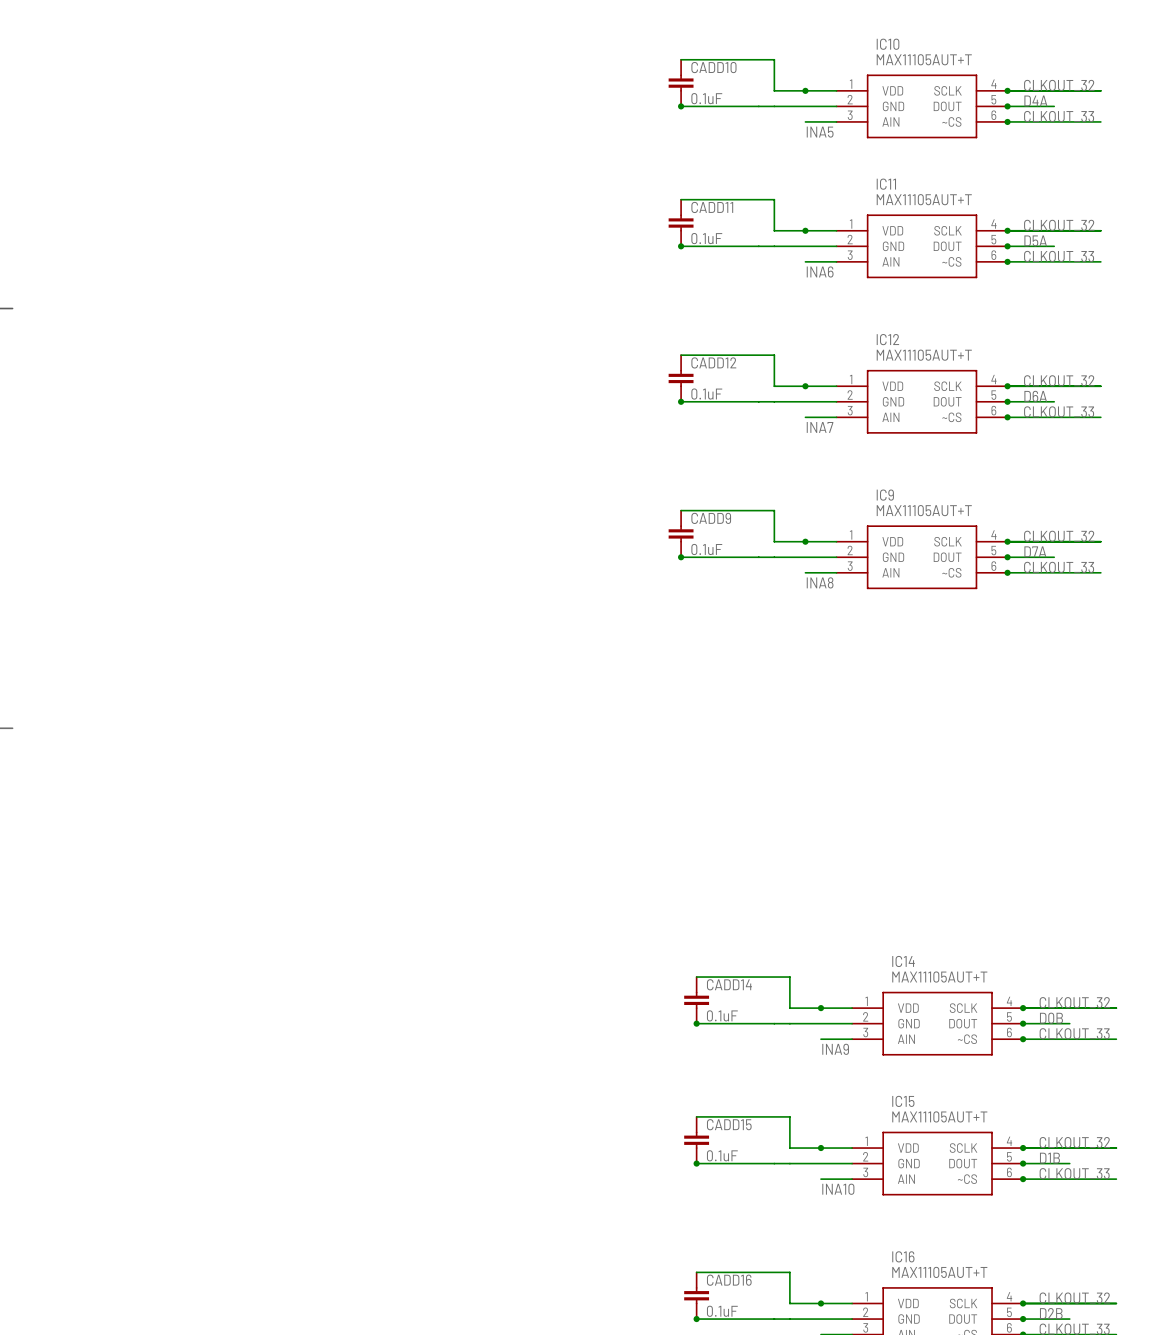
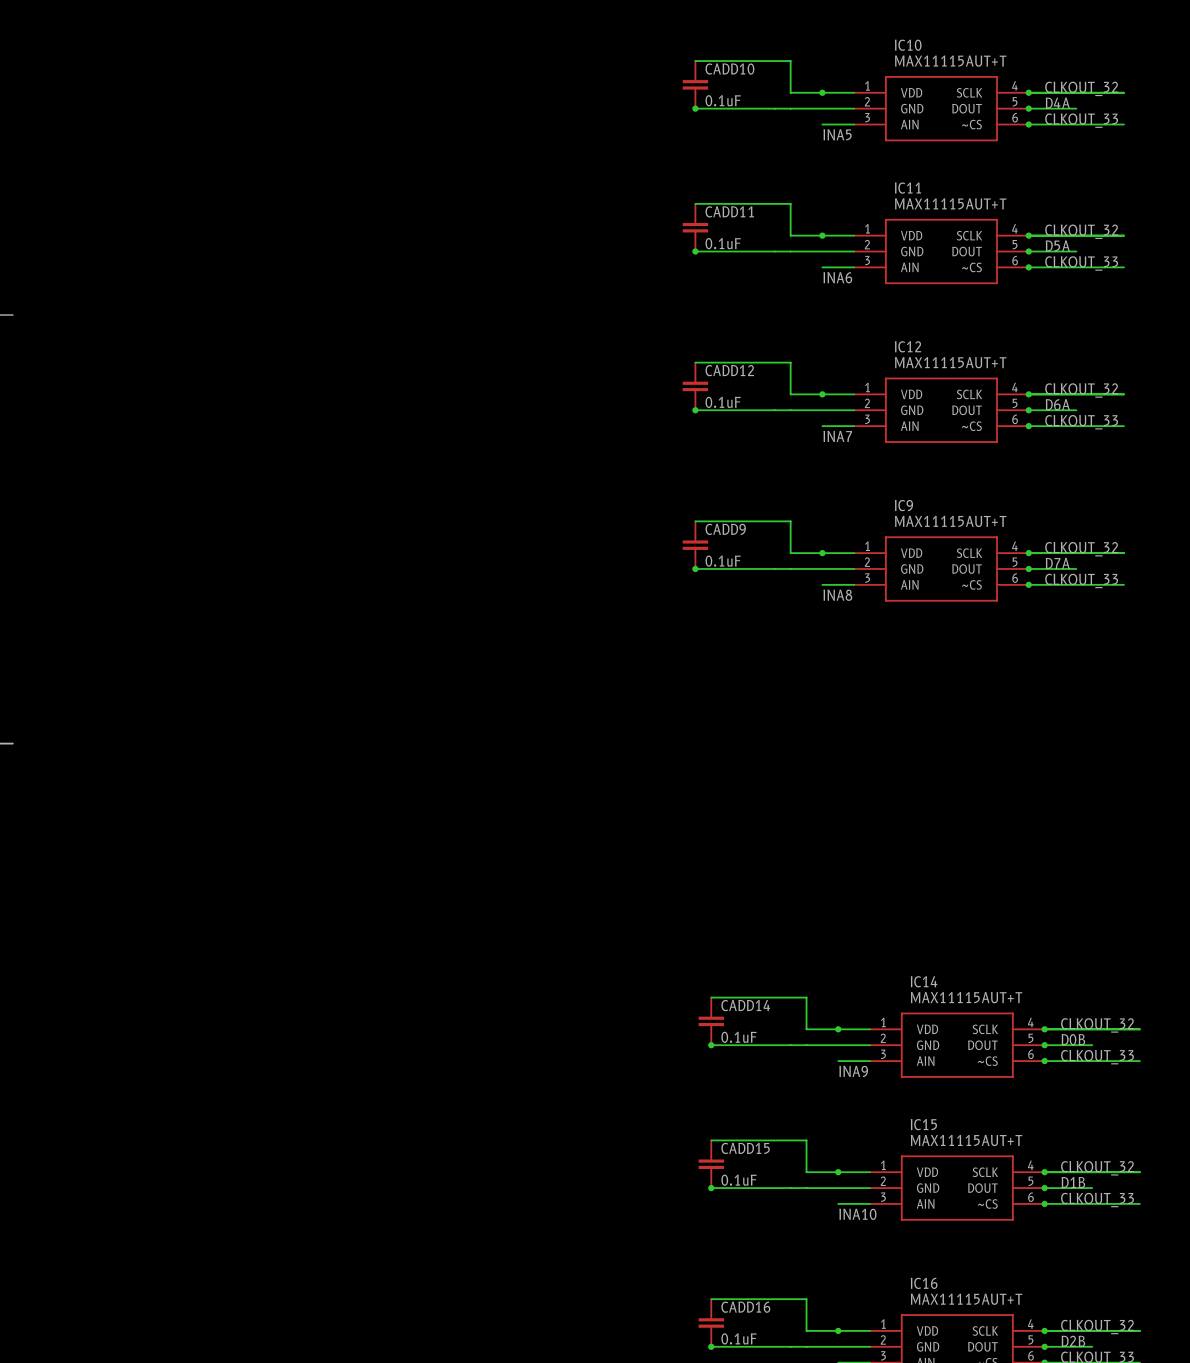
IC10 value: MAX11105AUT+T (924, 59) -> MAX11115AUT+T (950, 61)
IC11 value: MAX11105AUT+T (924, 199) -> MAX11115AUT+T (950, 203)
IC12 value: MAX11105AUT+T (924, 355) -> MAX11115AUT+T (950, 362)
IC9 value: MAX11105AUT+T (924, 510) -> MAX11115AUT+T (950, 521)
IC14 value: MAX11105AUT+T (939, 977) -> MAX11115AUT+T (966, 997)
IC15 value: MAX11105AUT+T (939, 1116) -> MAX11115AUT+T (966, 1140)
IC16 value: MAX11105AUT+T (939, 1272) -> MAX11115AUT+T (966, 1299)

